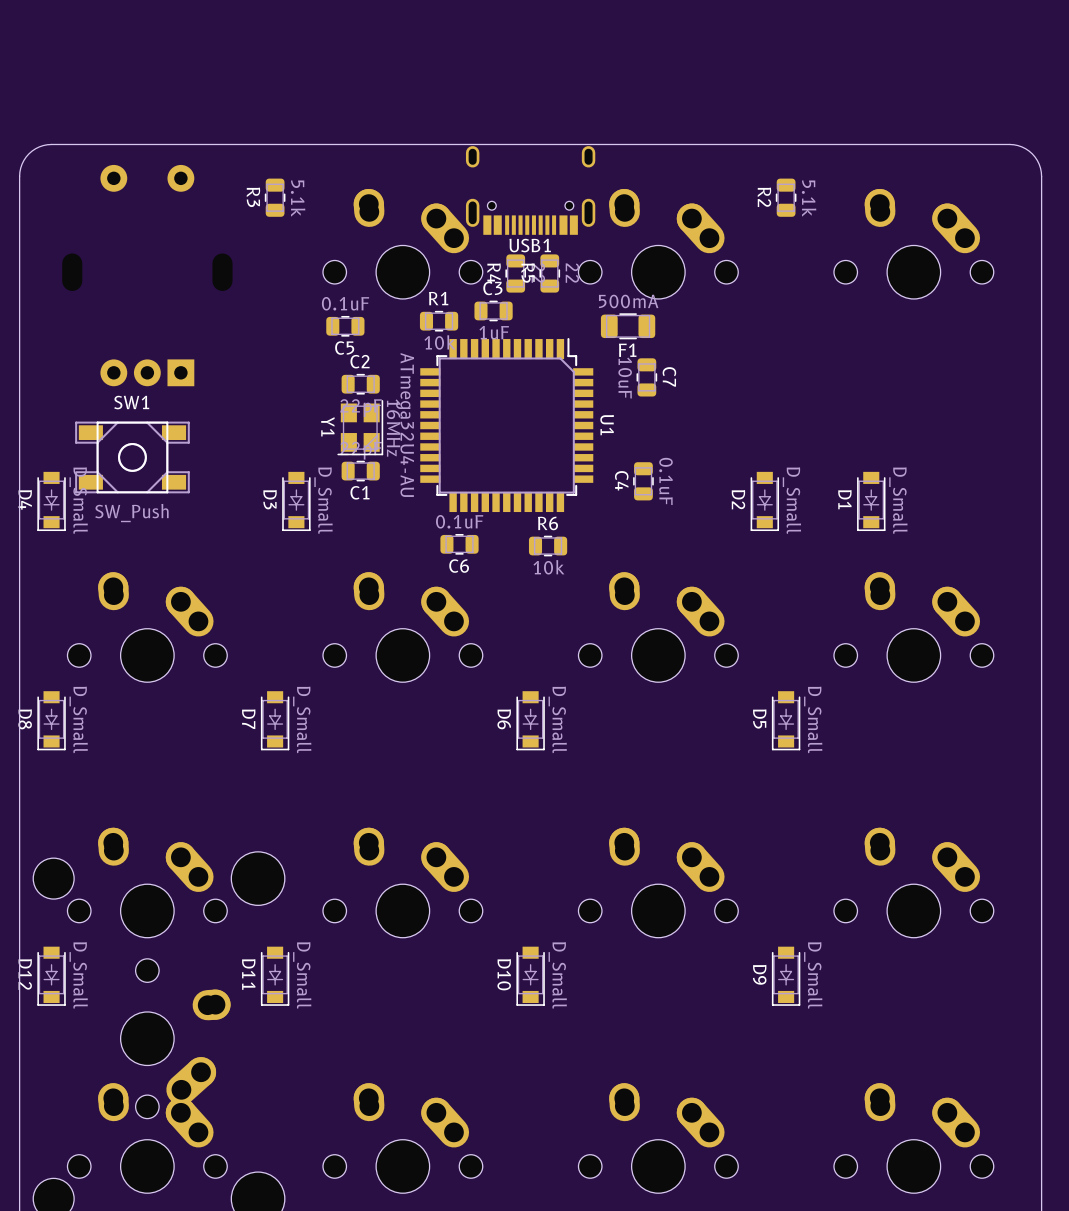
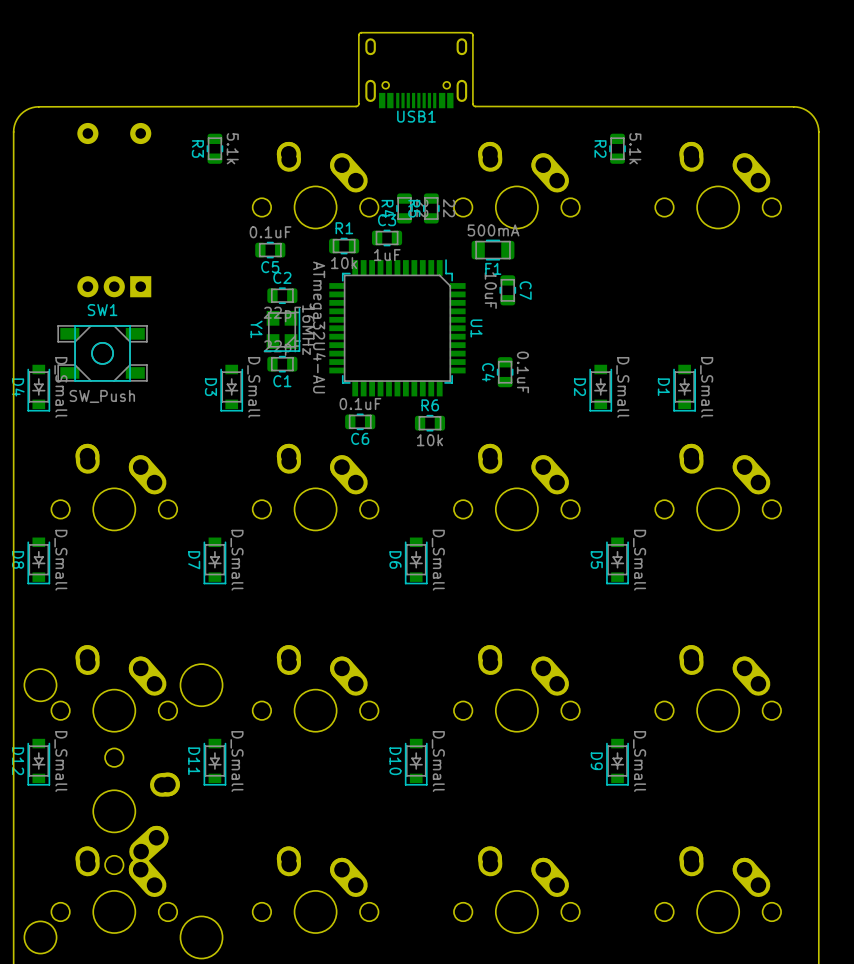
board edge: (1009, 144) (51, 144) -> (793, 106) (474, 106) (472, 103) (472, 35) (470, 32) (360, 33) (358, 103) (356, 106) (38, 106)
USB1 position: (530, 190) -> (416, 73)

